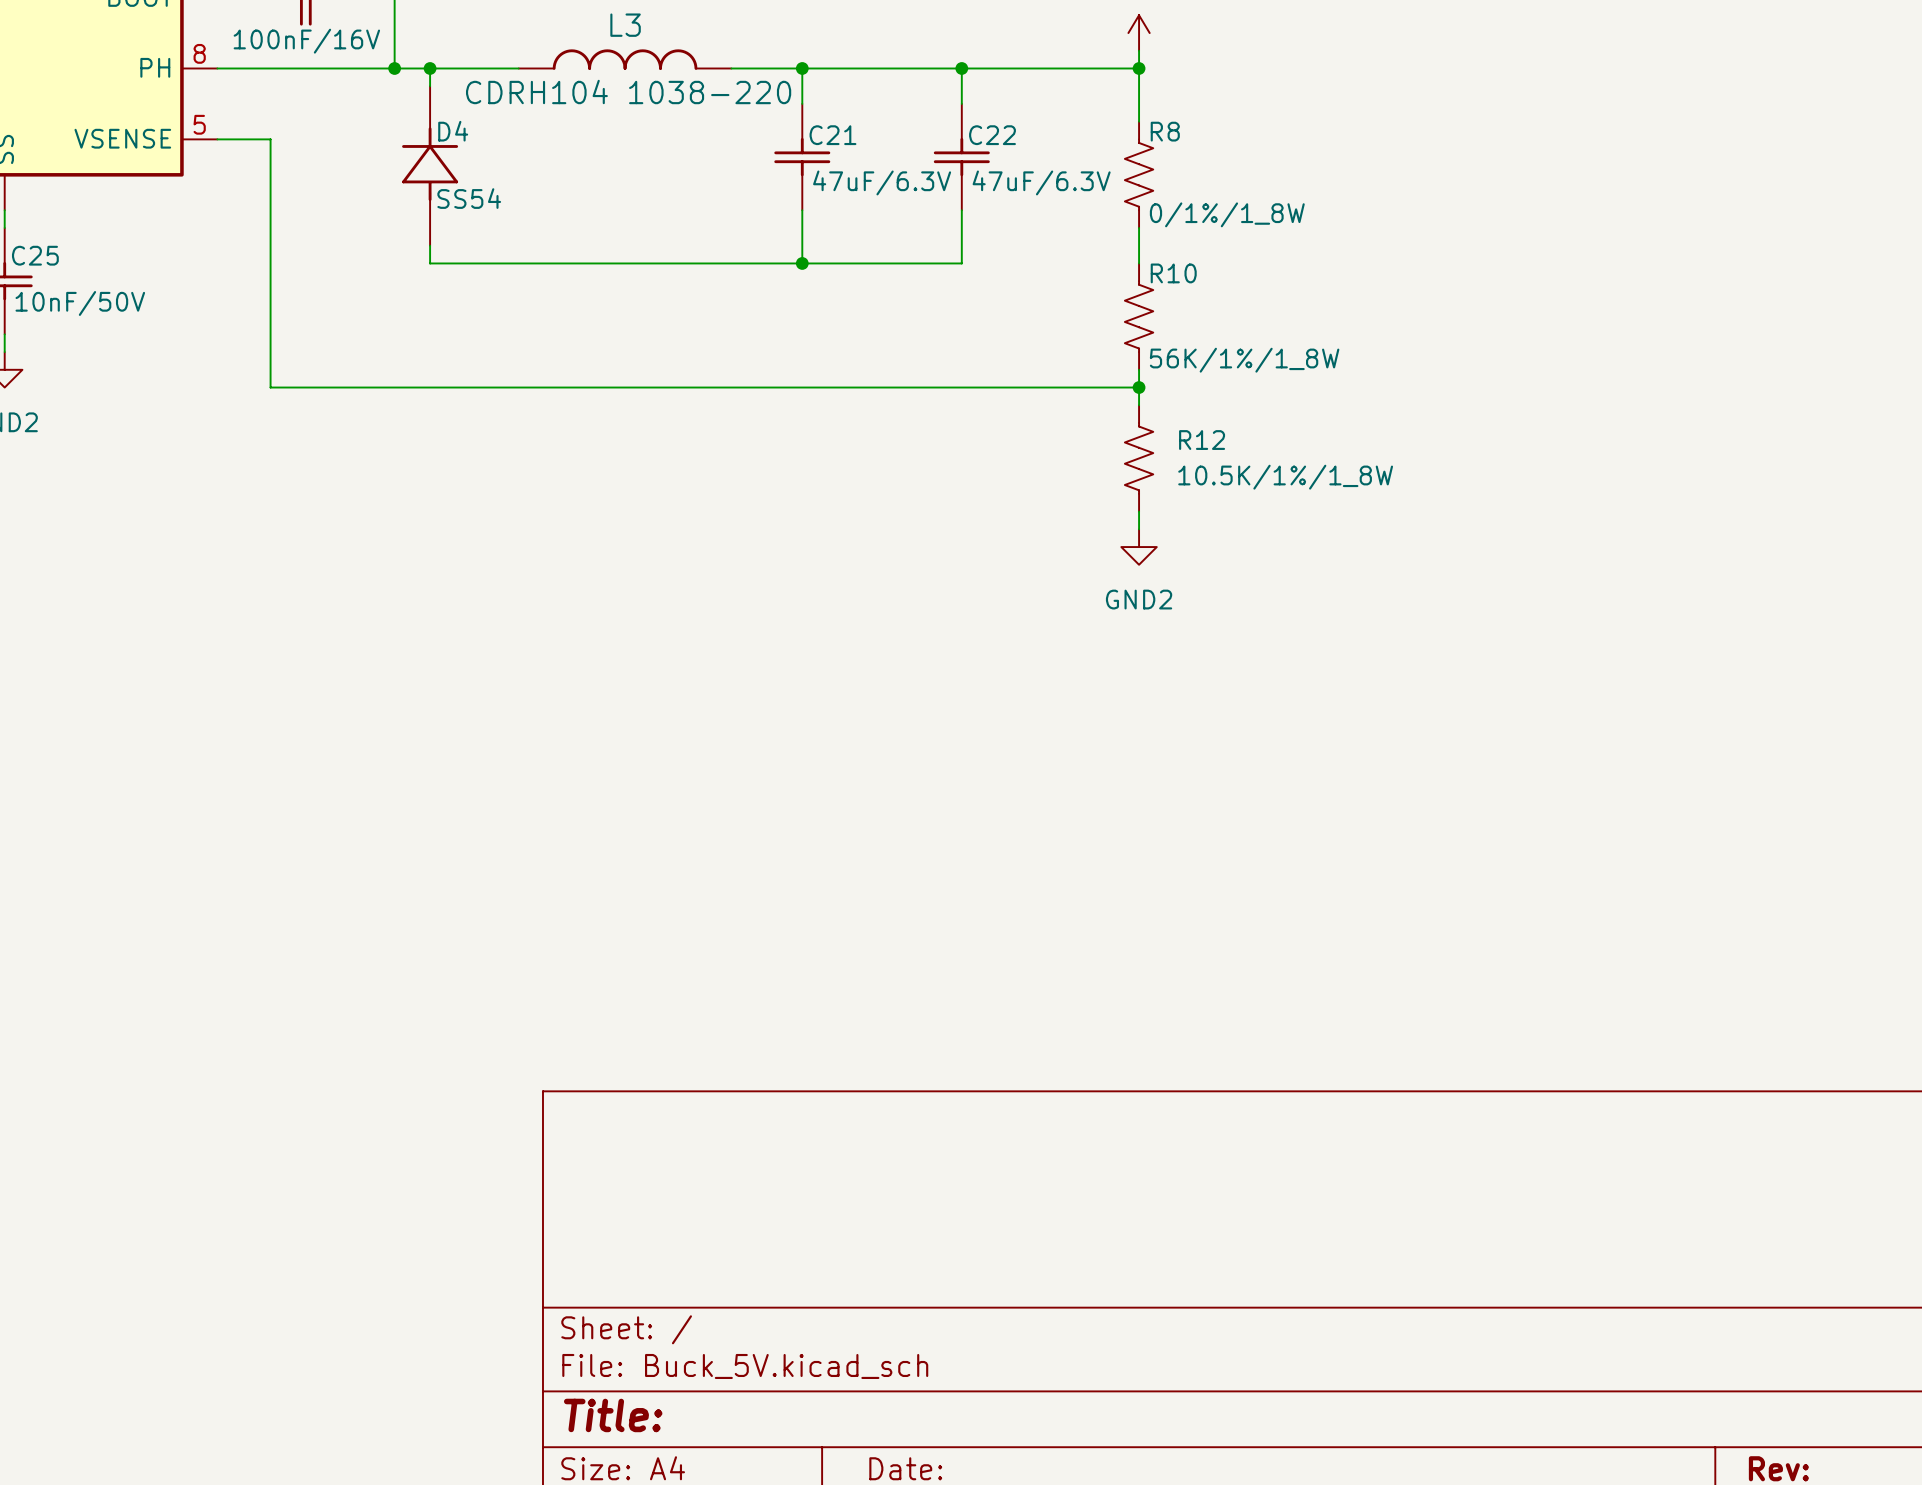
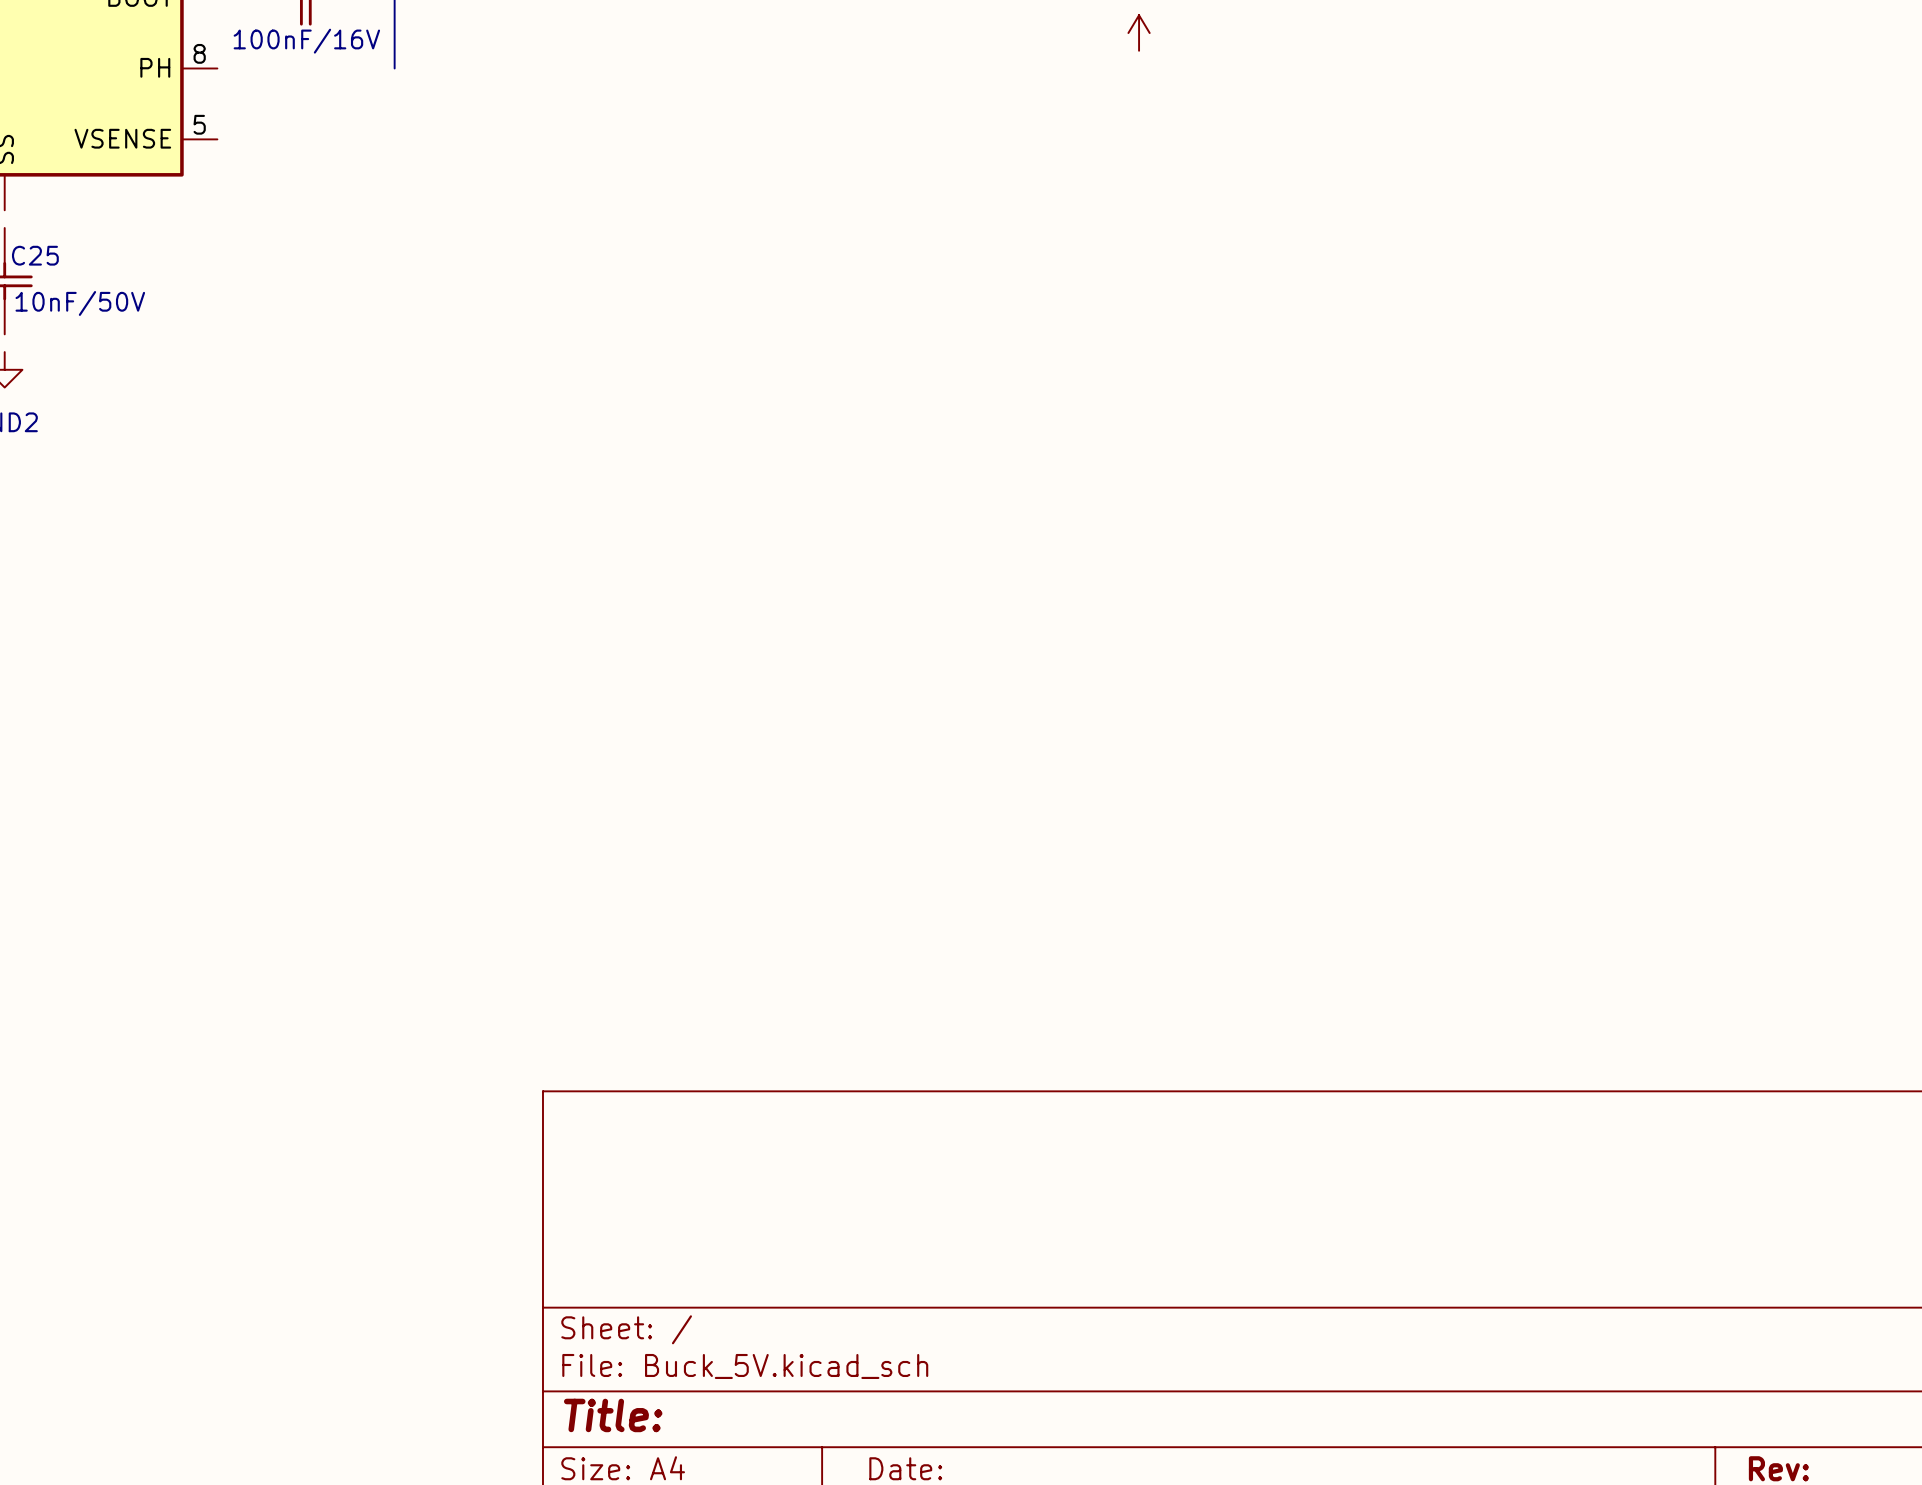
wire: (1139, 50) (1139, 121) -> none
L3: CDRH104 1038-220 (625, 59) -> none
wire: (217, 68) (518, 68) -> none
junction: (394, 68) -> none
wire: (430, 68) (430, 86) -> none
junction: (430, 68) -> none
wire: (731, 68) (1139, 68) -> none
wire: (802, 68) (802, 103) -> none
junction: (802, 68) -> none
wire: (961, 68) (961, 103) -> none
junction: (961, 68) -> none
junction: (1139, 68) -> none
wire: (217, 139) (270, 139) (270, 387) (1139, 387) -> none
C21: 47uF/6.3V (802, 157) -> none
C22: 47uF/6.3V (961, 157) -> none
D4: SS54 (430, 165) -> none
R8: 0/1%/1_8W (1139, 174) -> none
wire: (4, 210) (4, 228) -> none
wire: (802, 210) (802, 263) -> none
wire: (961, 210) (961, 263) (430, 263) (430, 245) -> none
wire: (1139, 228) (1139, 263) -> none
junction: (802, 263) -> none
R10: 56K/1%/1_8W (1139, 316) -> none
wire: (4, 334) (4, 352) -> none
wire: (1139, 369) (1139, 405) -> none
junction: (1139, 387) -> none
R12: 10.5K/1%/1_8W (1139, 458) -> none
wire: (1139, 511) (1139, 529) -> none
power symbol: GND2 (1139, 547) -> none

